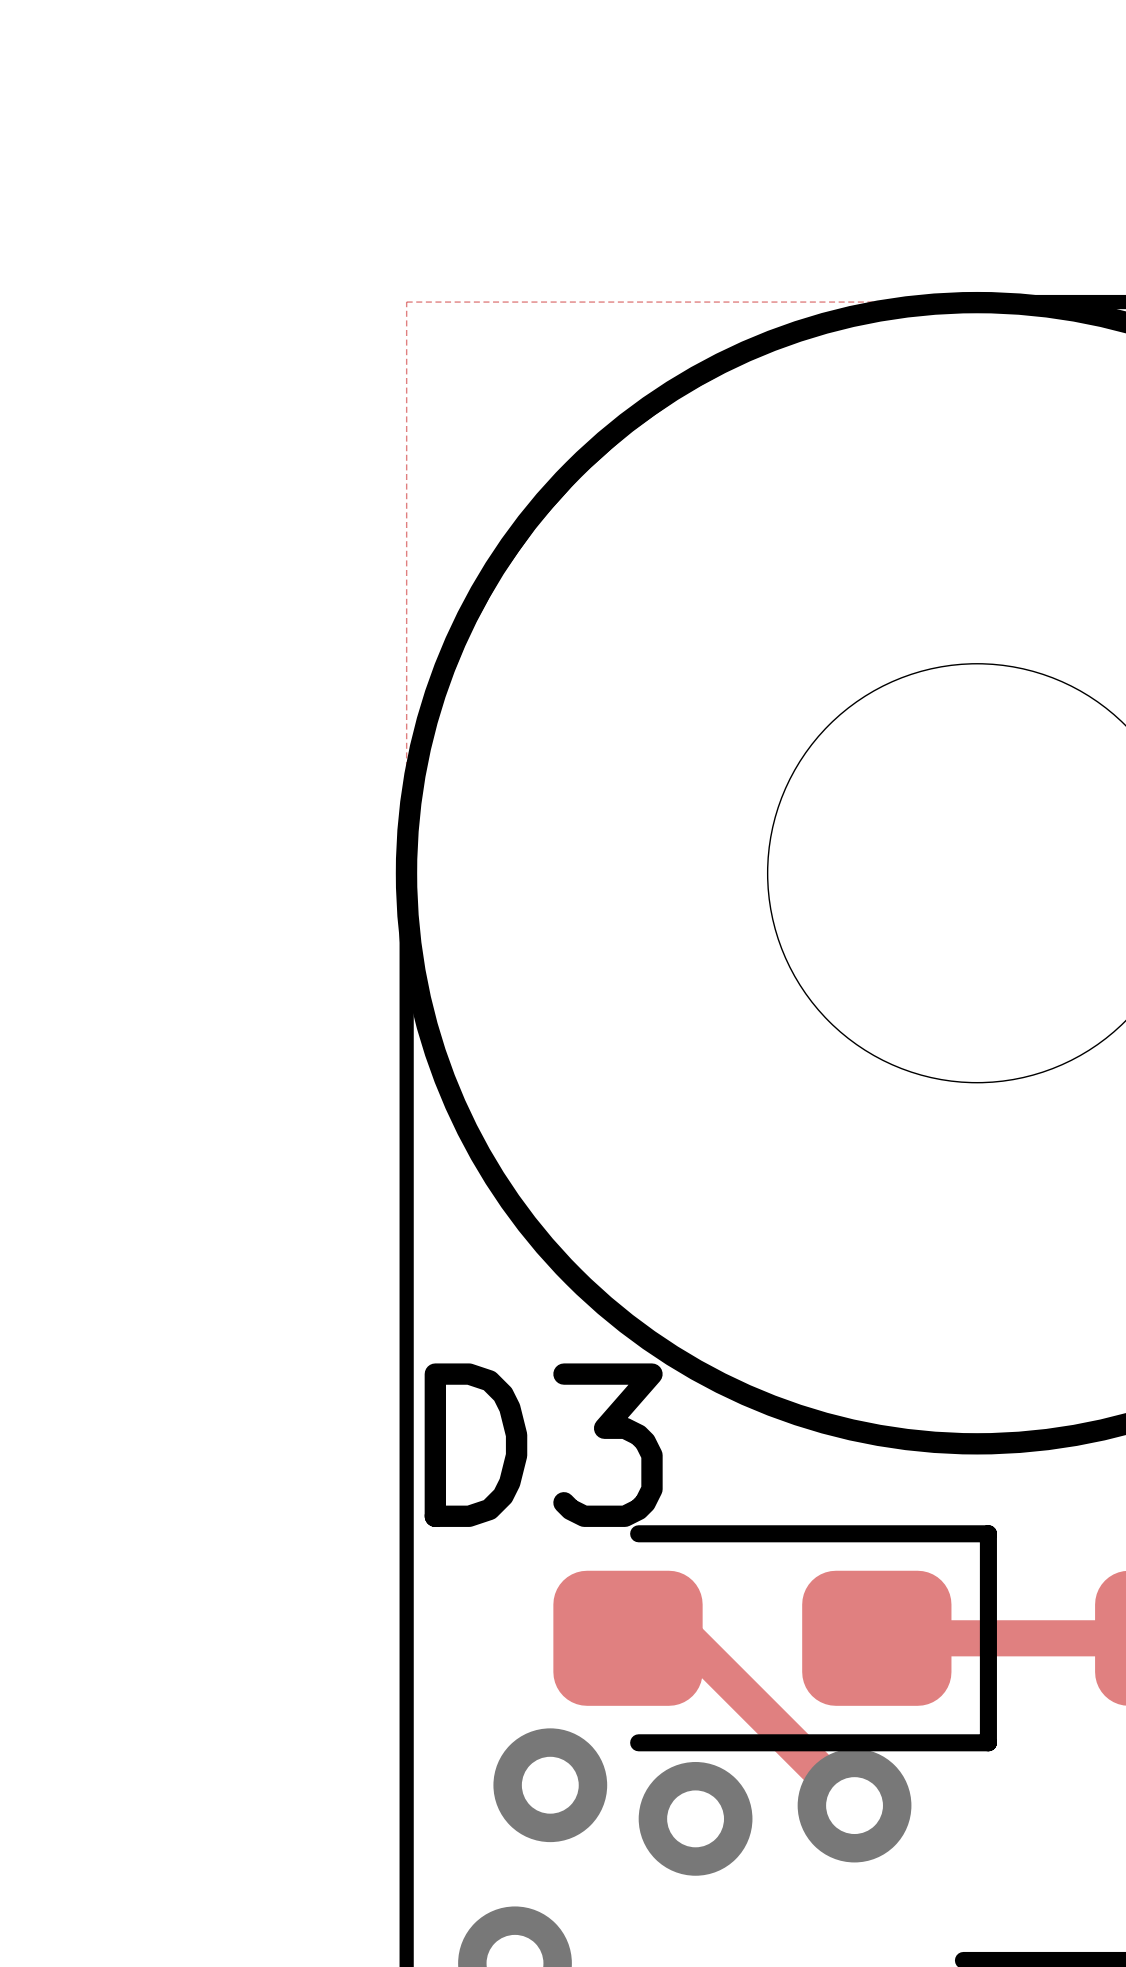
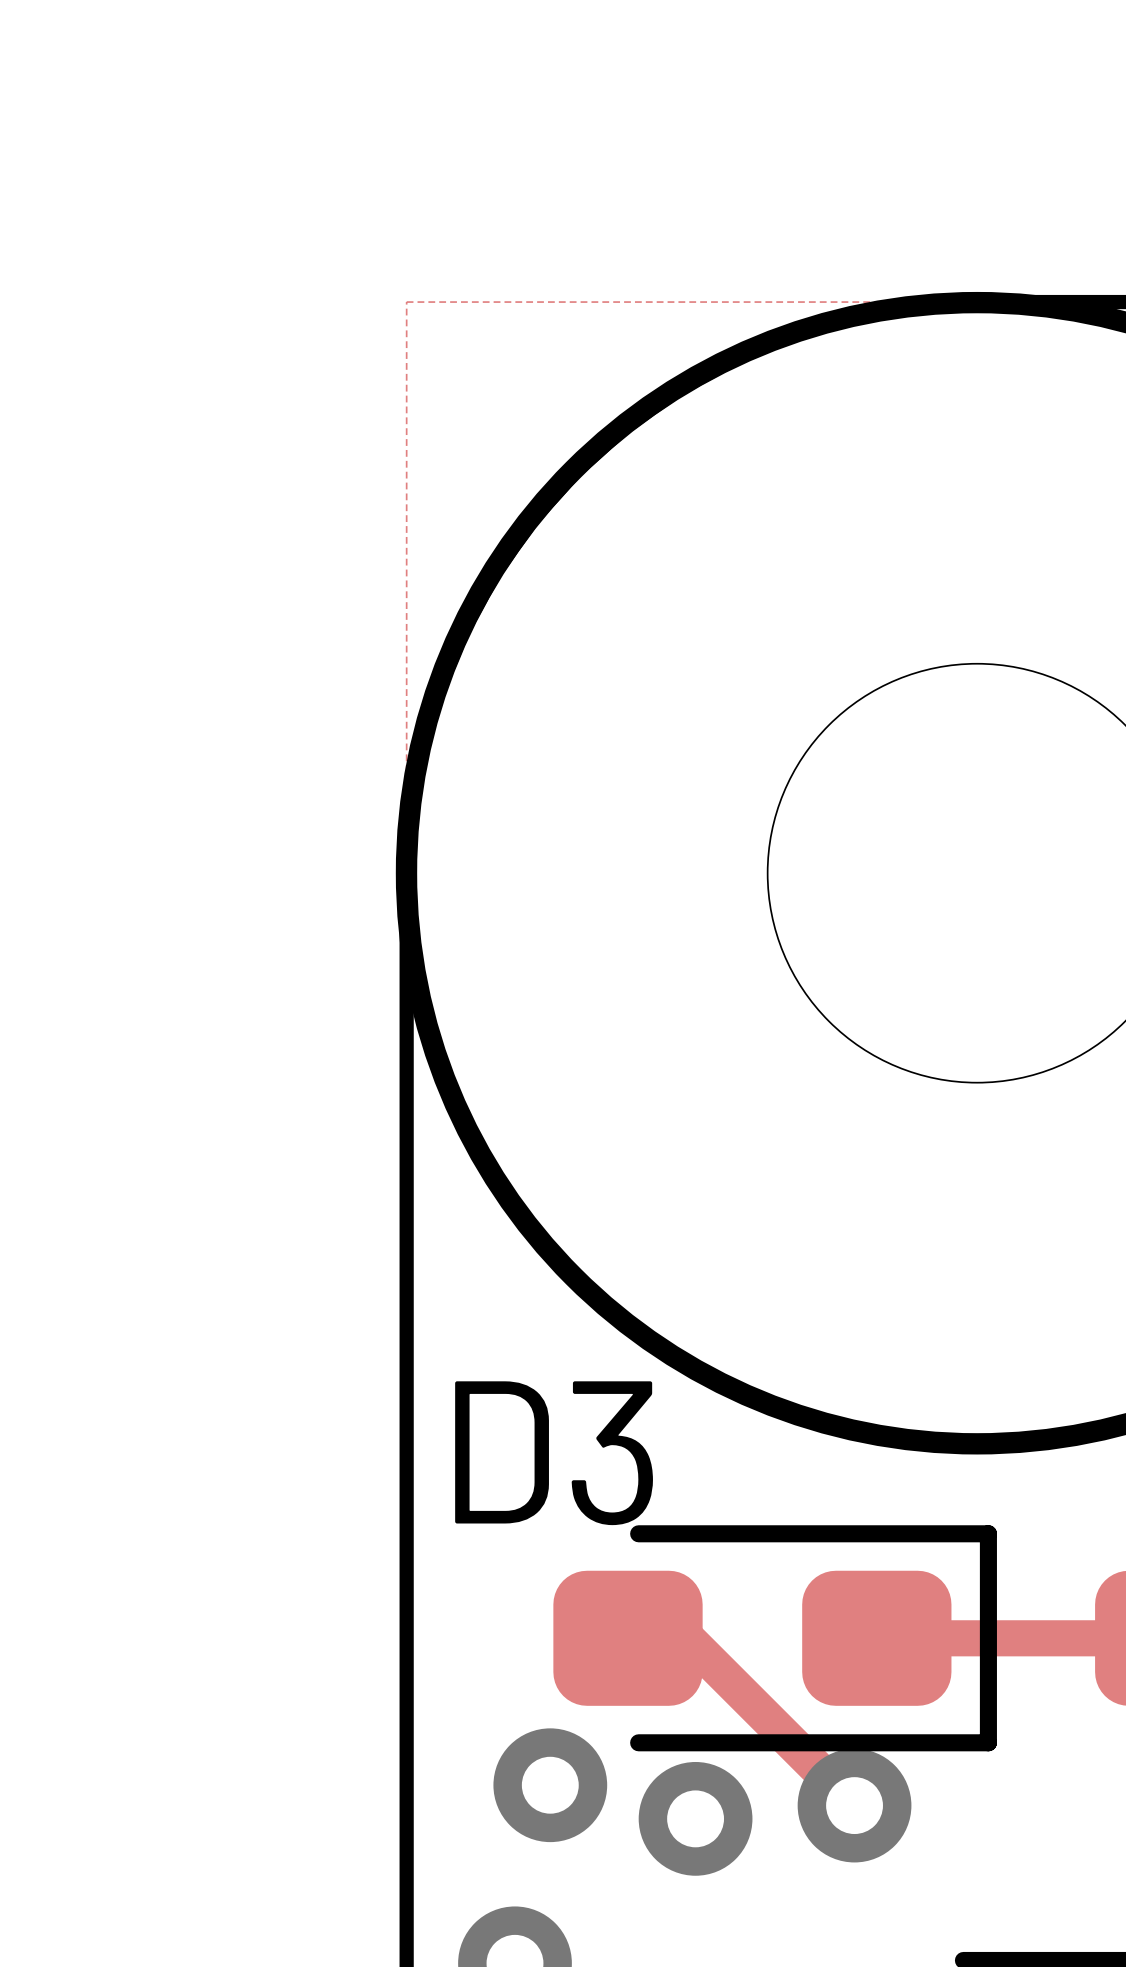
D3 name position: D3 (543, 1445) -> D3 (554, 1453)

